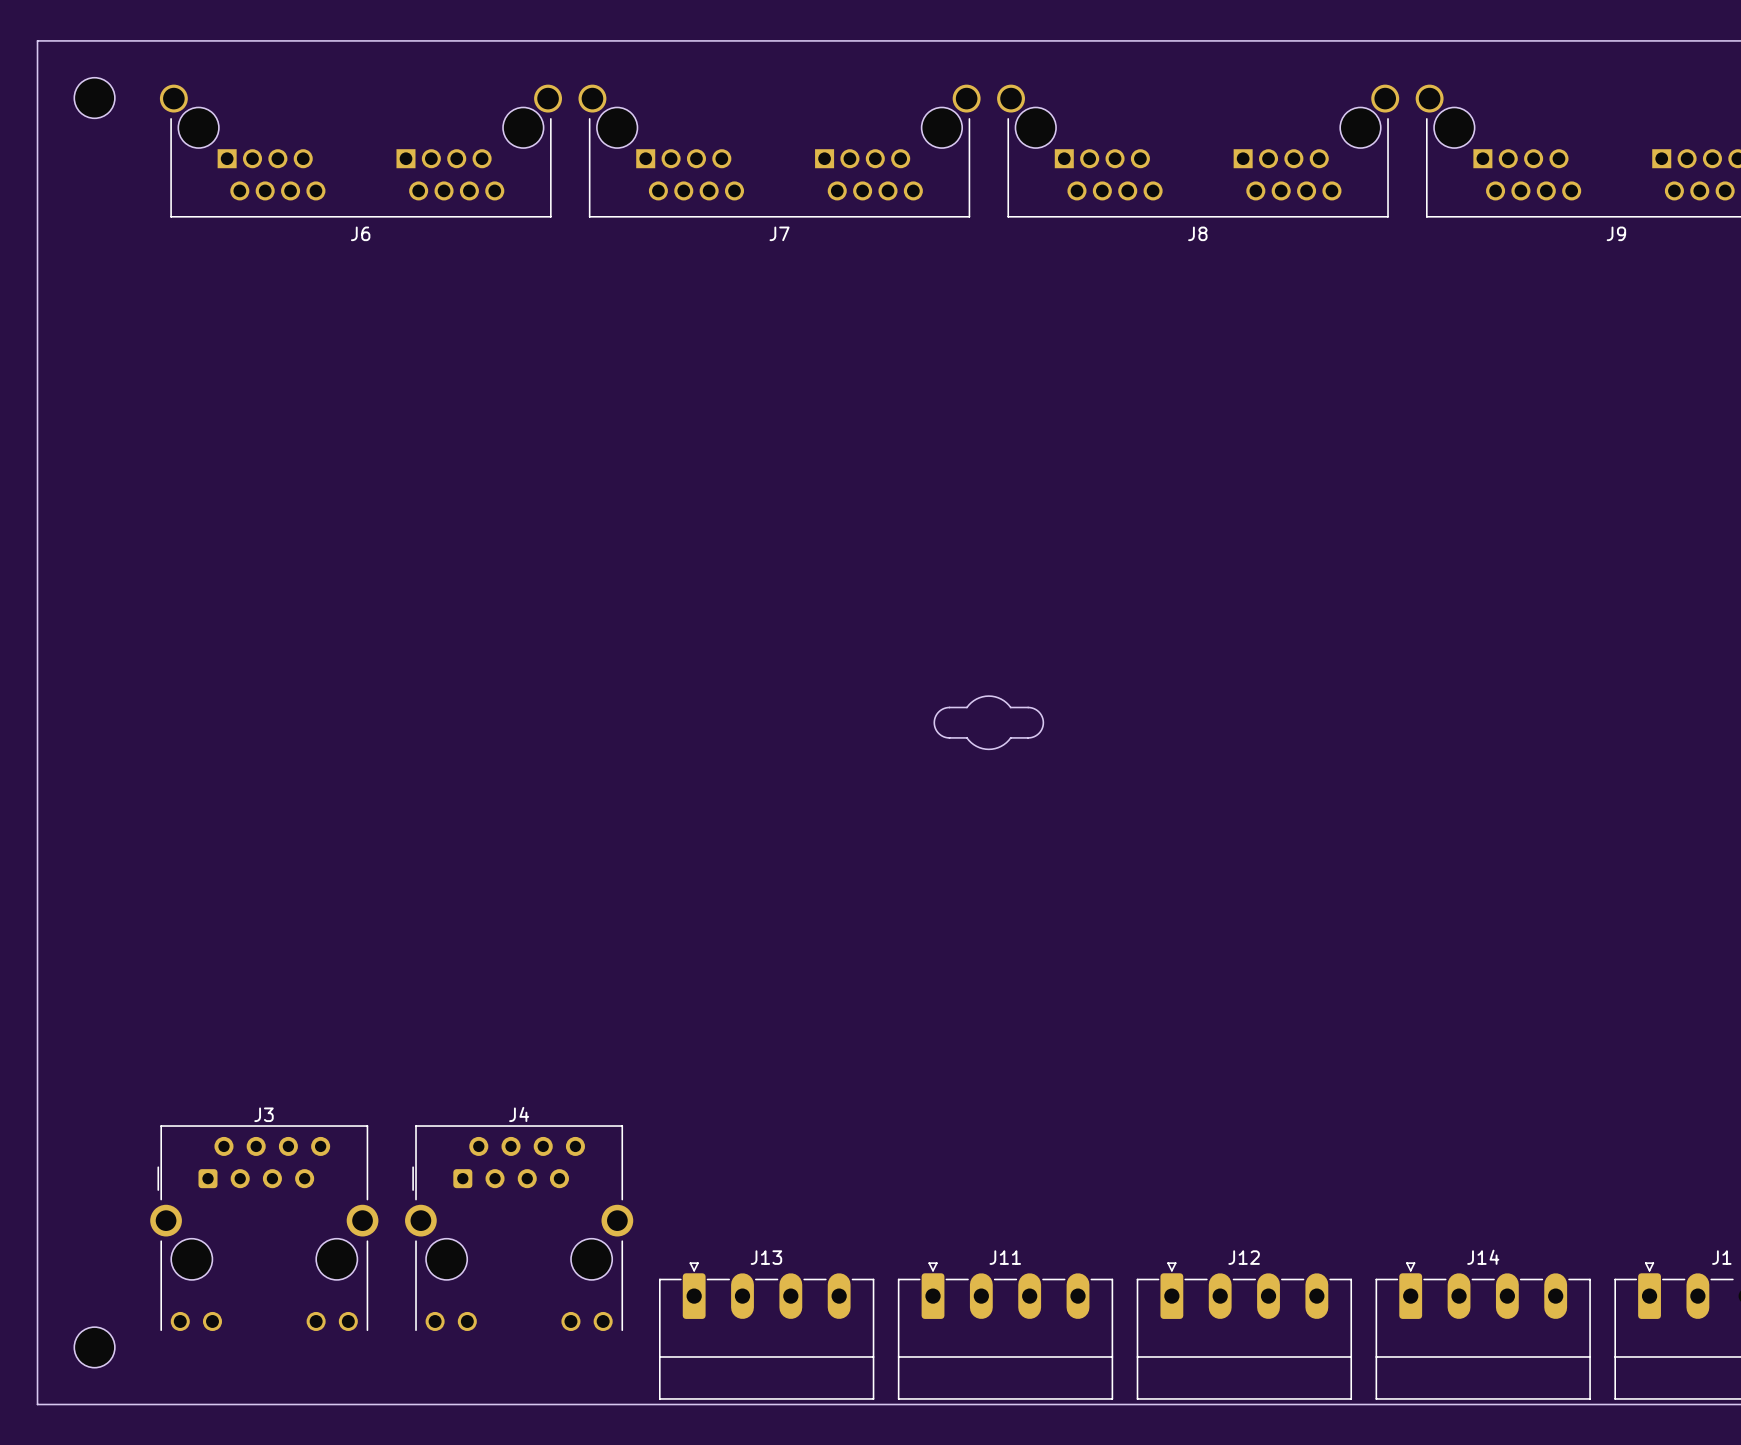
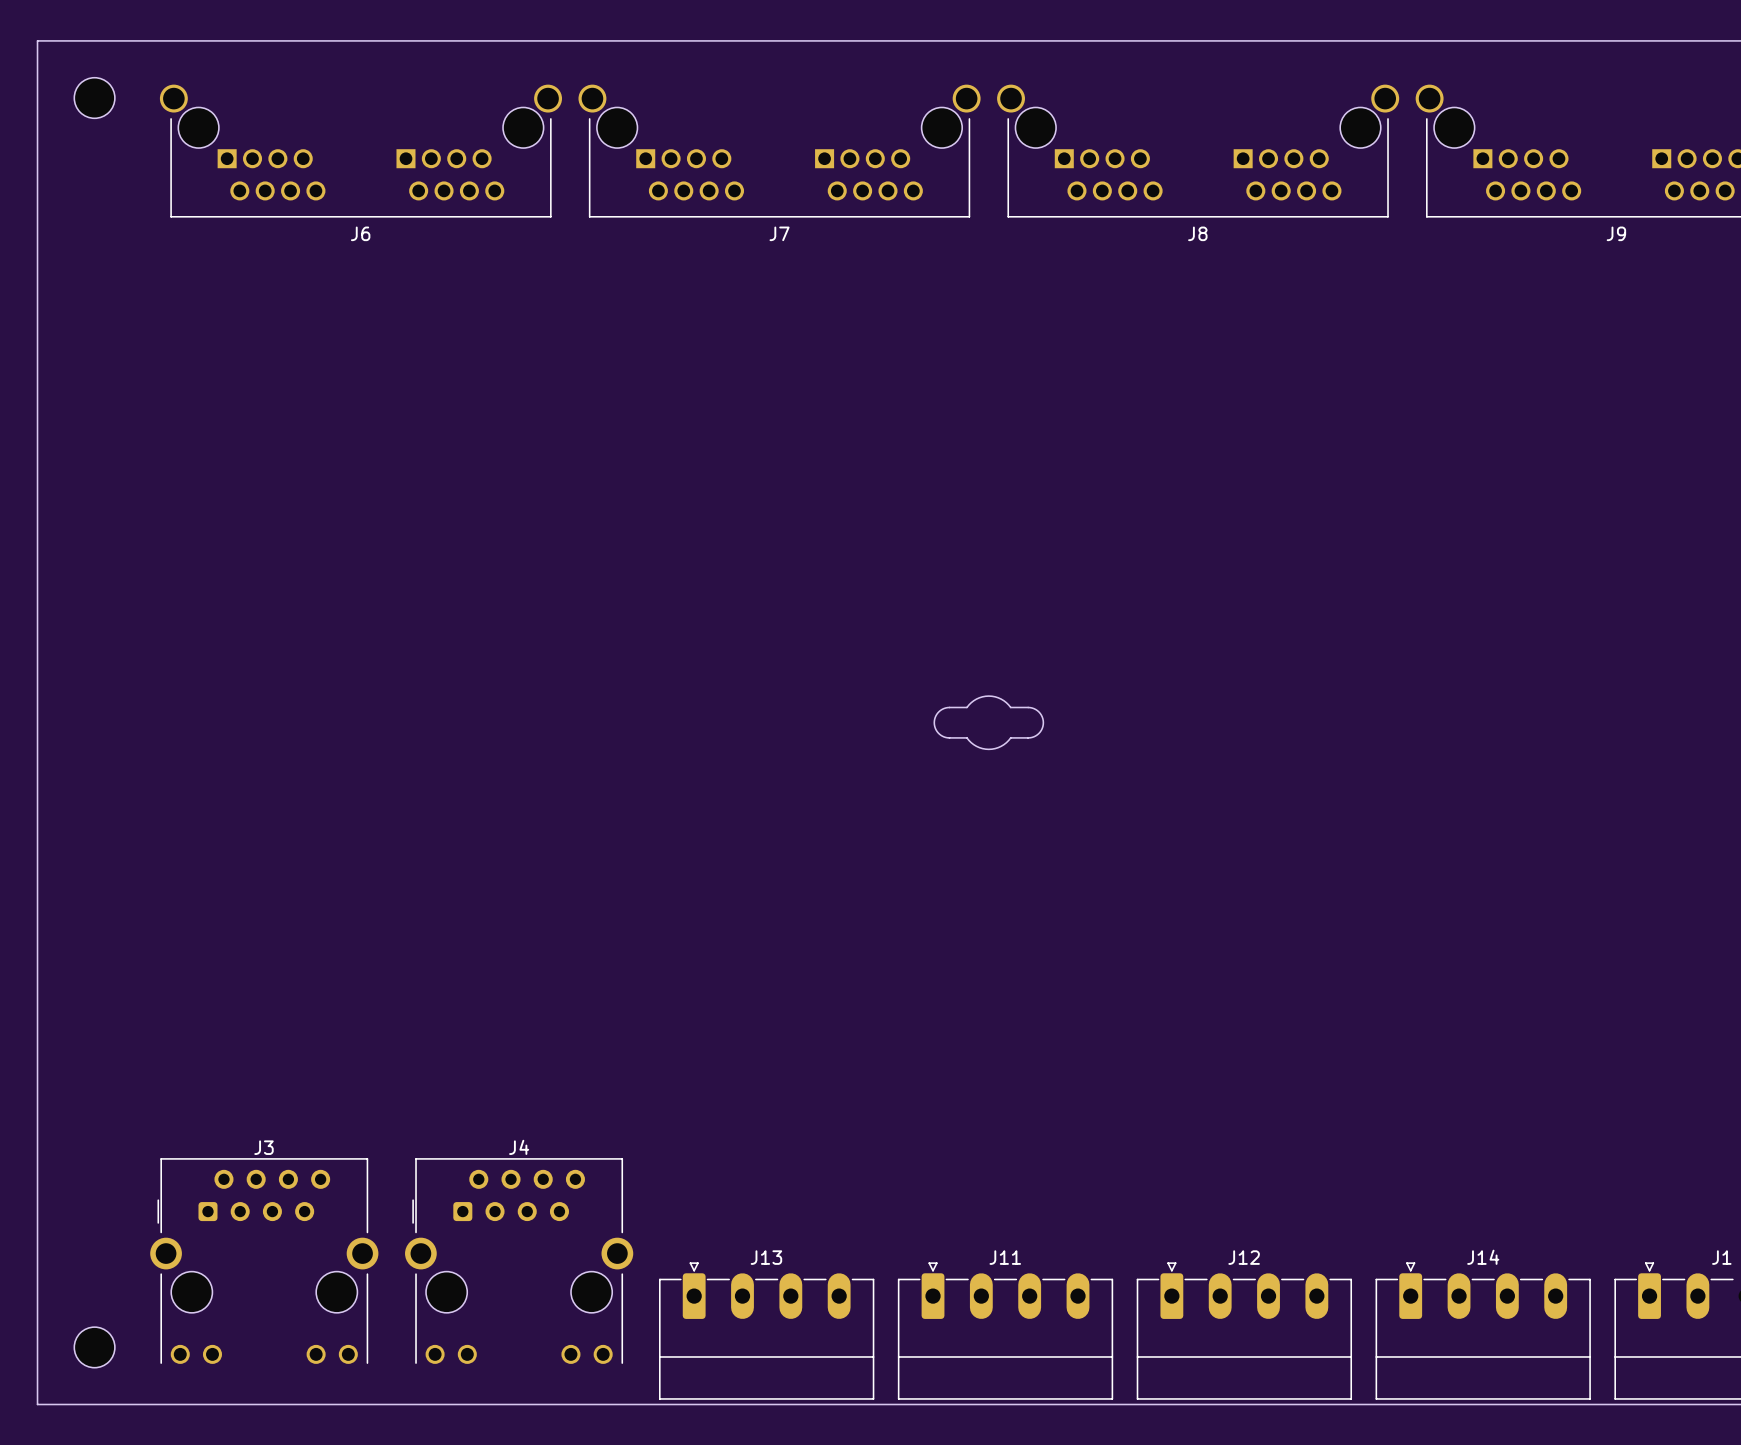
J3 position: (264, 1228) -> (264, 1261)
J4 position: (519, 1228) -> (519, 1261)

